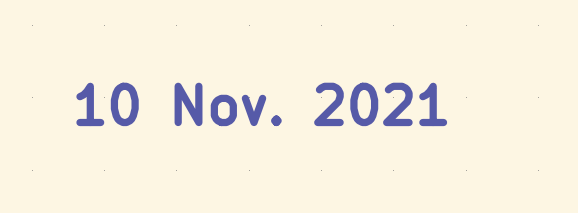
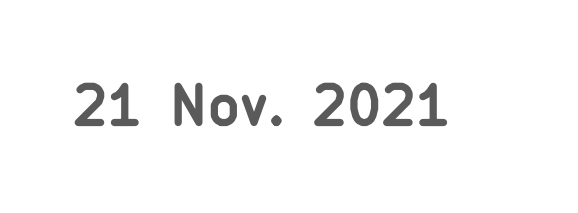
text: 10 Nov. 2021 (261, 104) -> 21 Nov. 2021 (260, 104)

